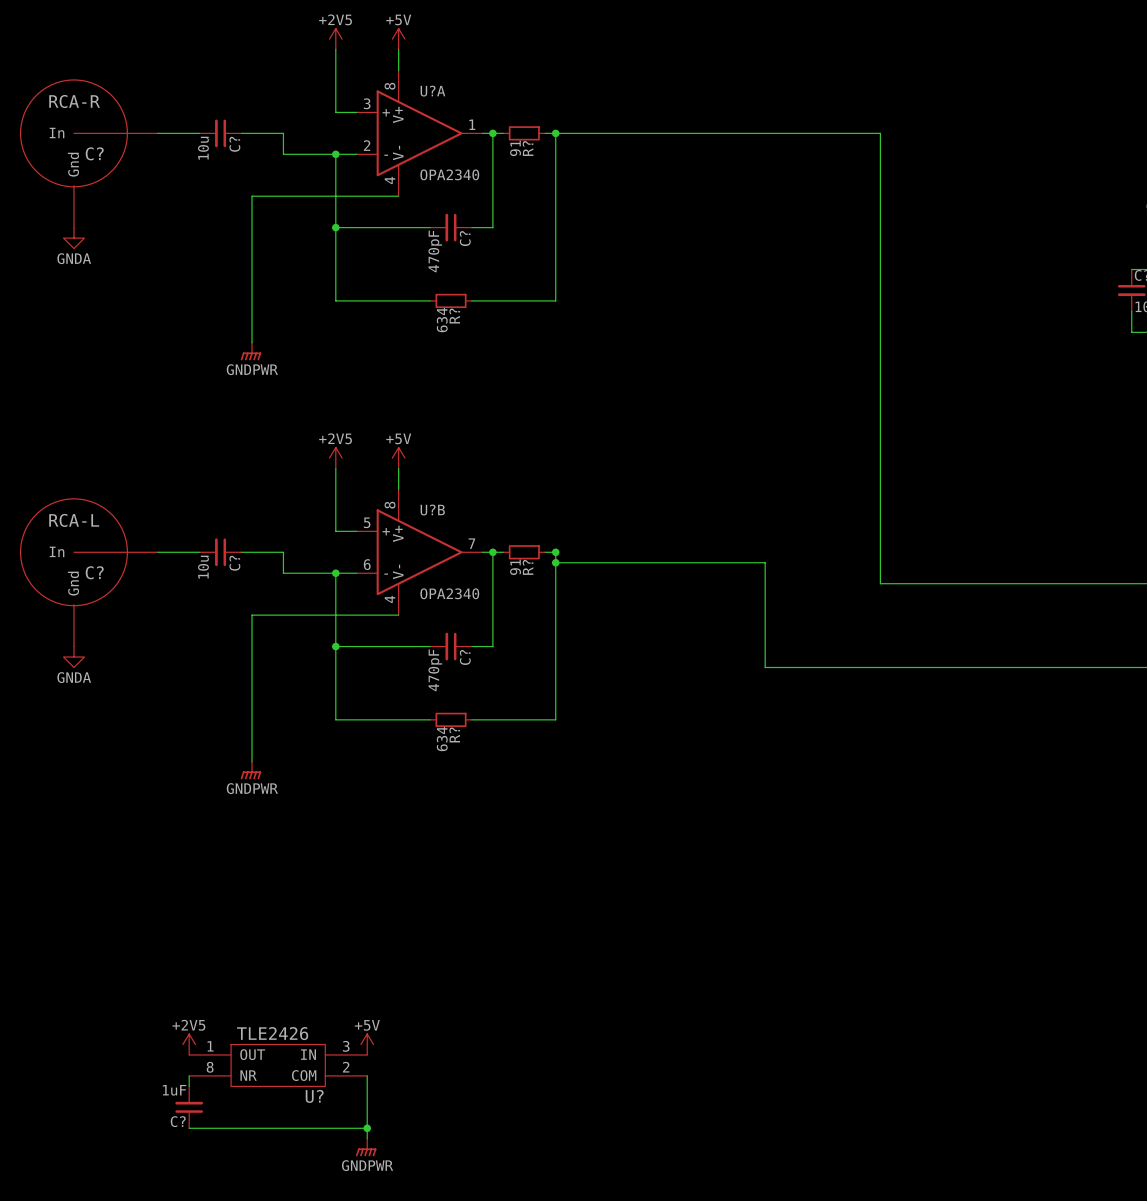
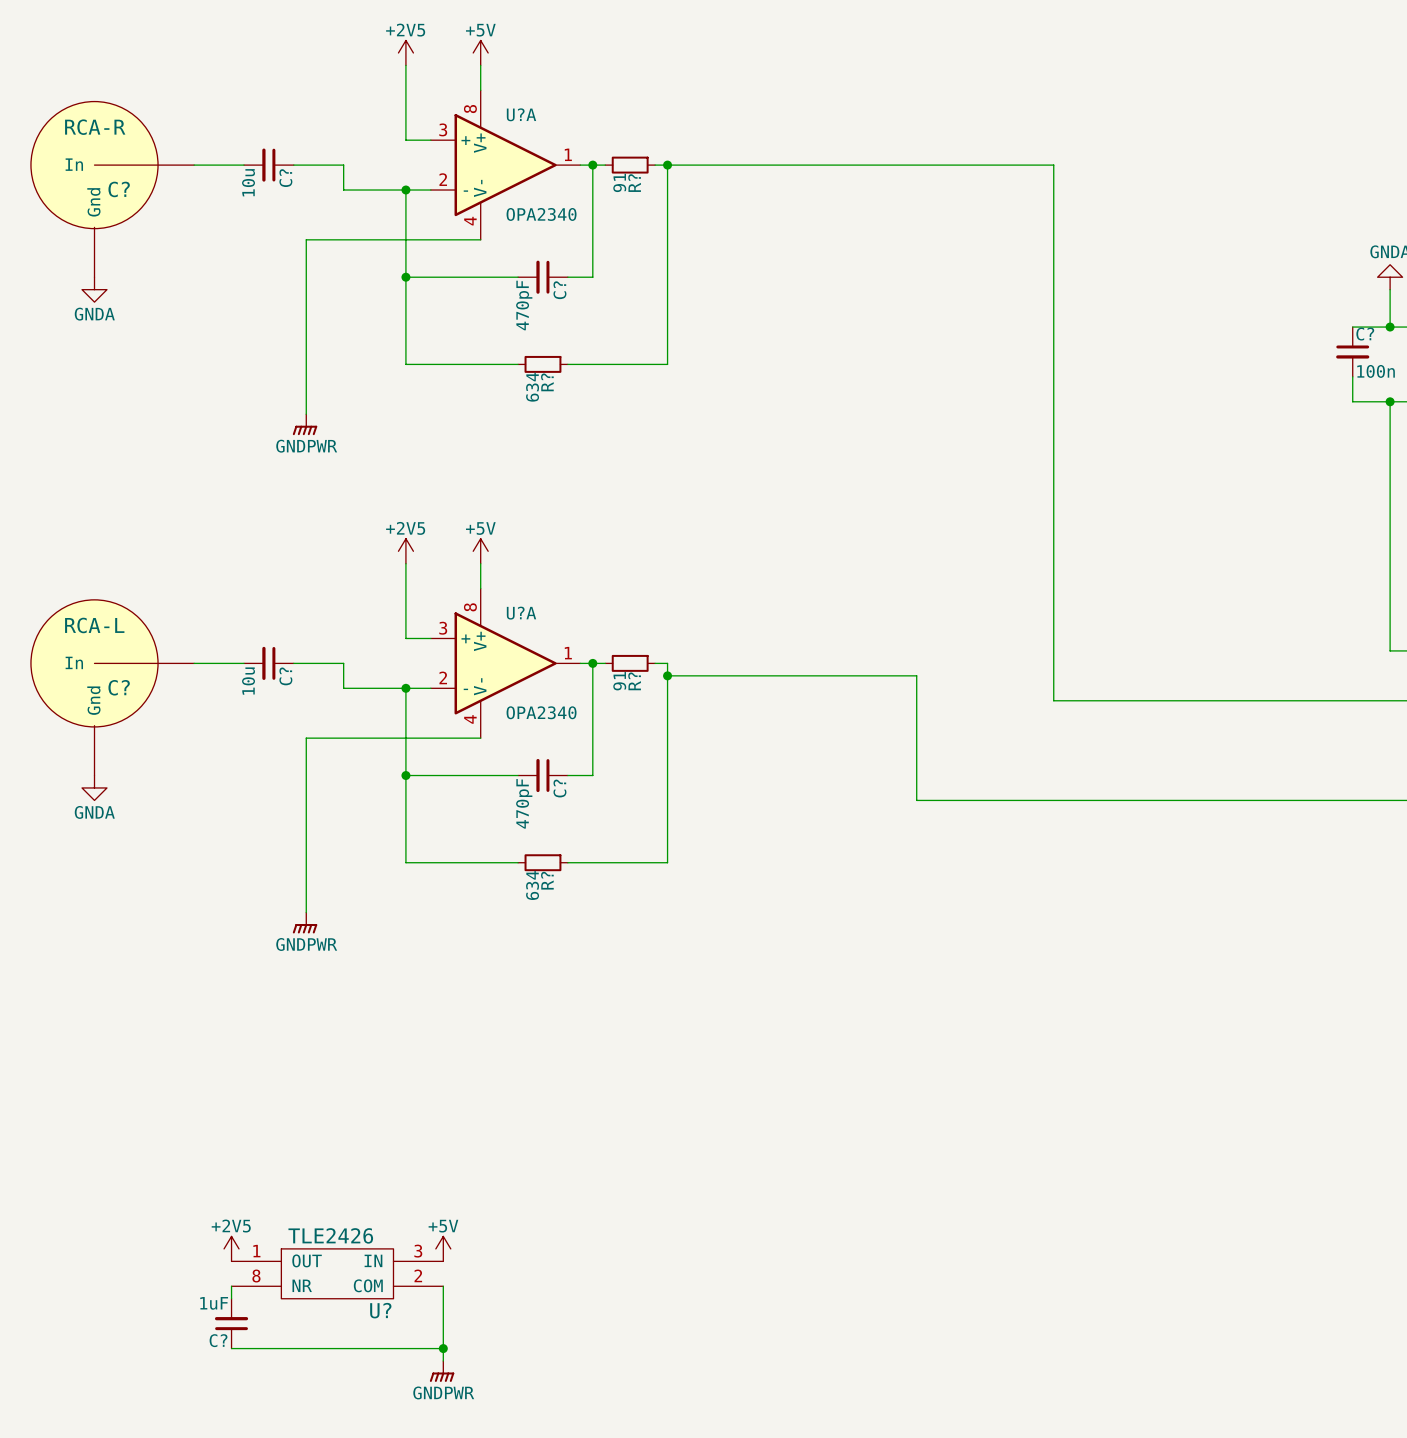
U?B name: U?B (432, 510) -> U?A (521, 613)
U?B pin number: 5 (367, 522) -> 3 (443, 628)
U?B pin number: 7 (471, 543) -> 1 (568, 653)
junction: (555, 552) -> none
U?B pin number: 6 (367, 564) -> 2 (443, 677)

